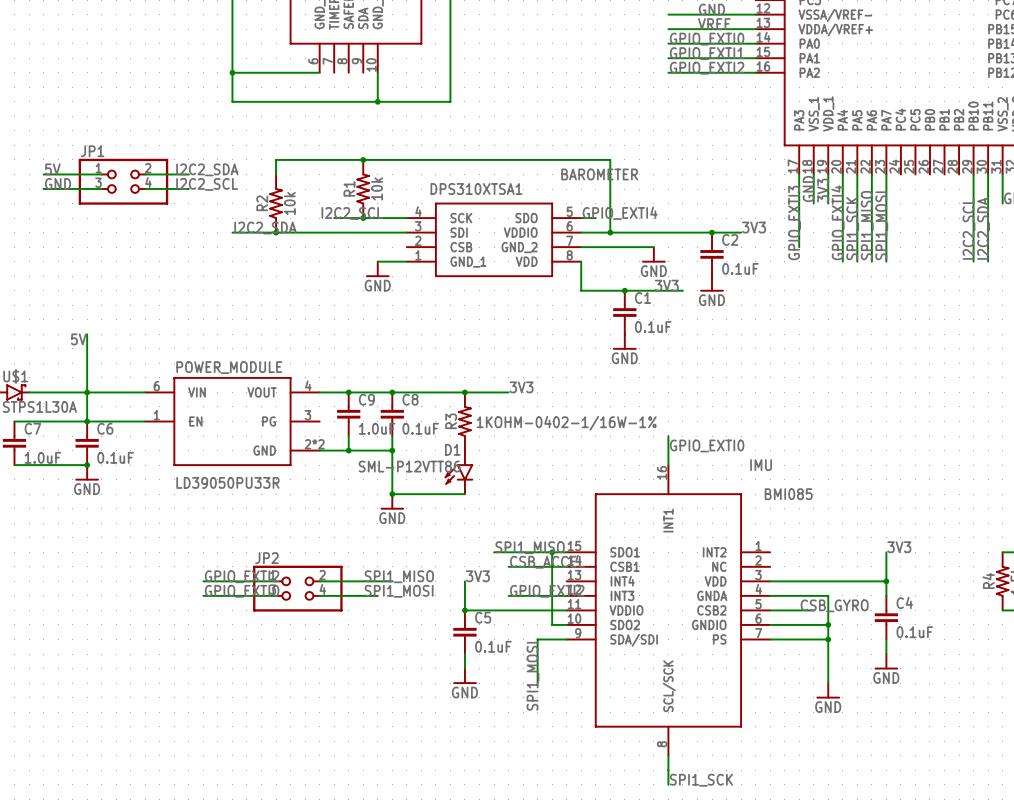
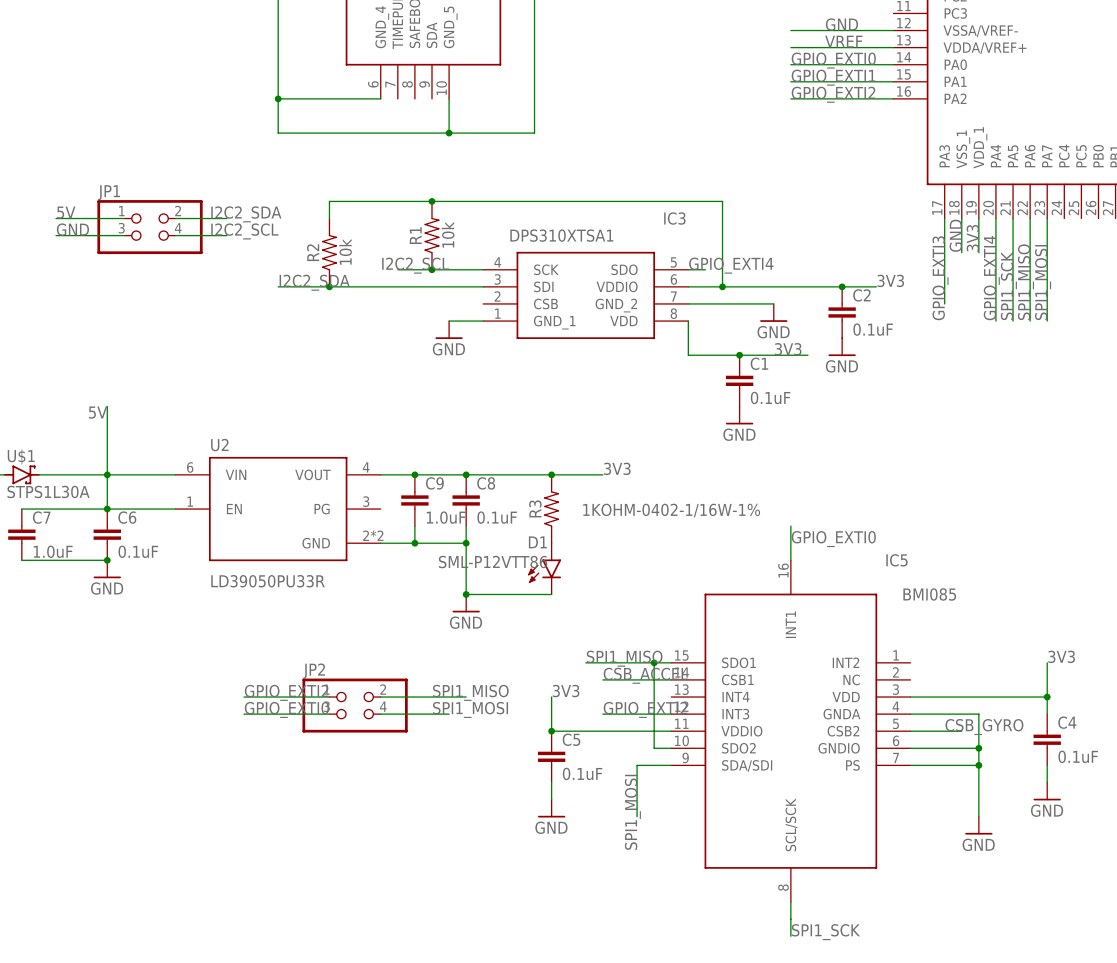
BAROMETER name: BAROMETER (599, 174) -> IC3 (674, 218)
POWER_MODULE name: POWER_MODULE (229, 367) -> U2 (219, 445)
IMU name: IMU (761, 465) -> IC5 (896, 560)

